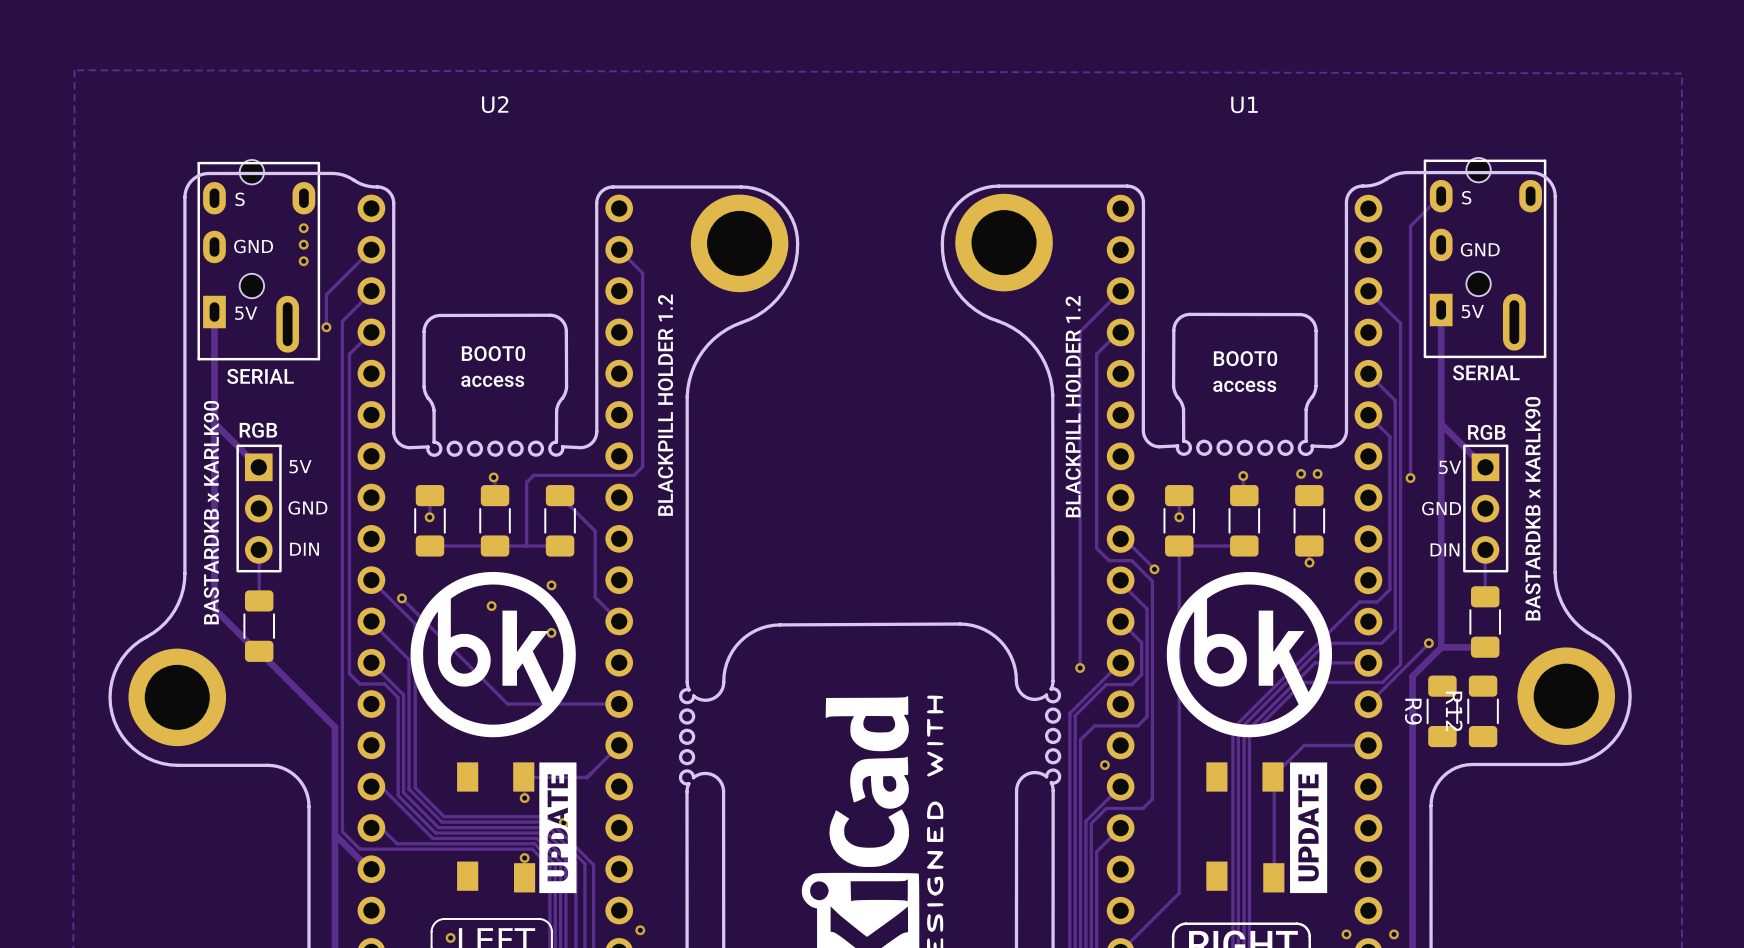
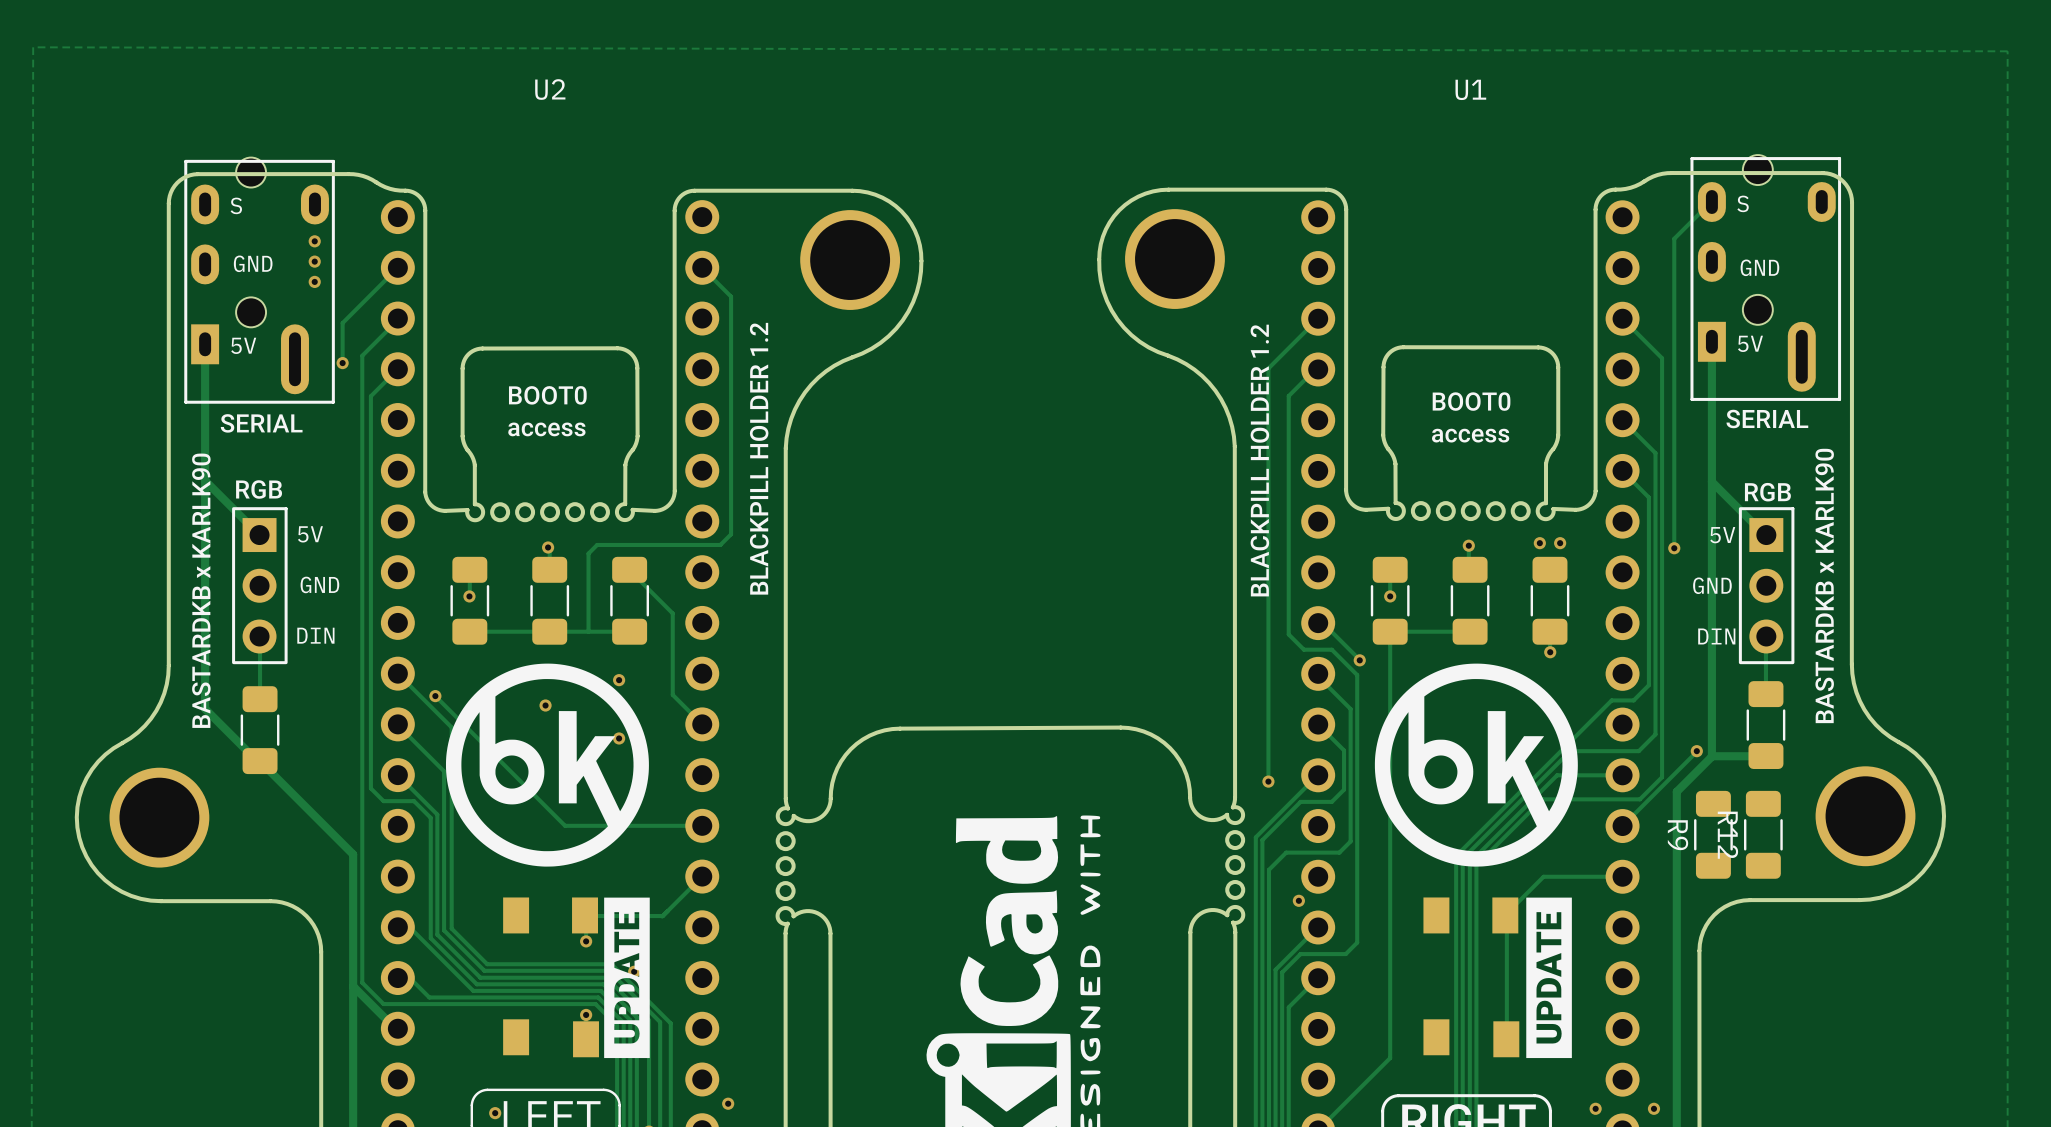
part footprint: [955, 193, 1053, 292] -> [1125, 209, 1225, 309]
part footprint: [690, 194, 789, 293] -> [800, 210, 901, 310]
part footprint: [1517, 647, 1615, 746] -> [1815, 766, 1916, 867]
part footprint: [128, 648, 227, 747] -> [109, 767, 210, 868]

